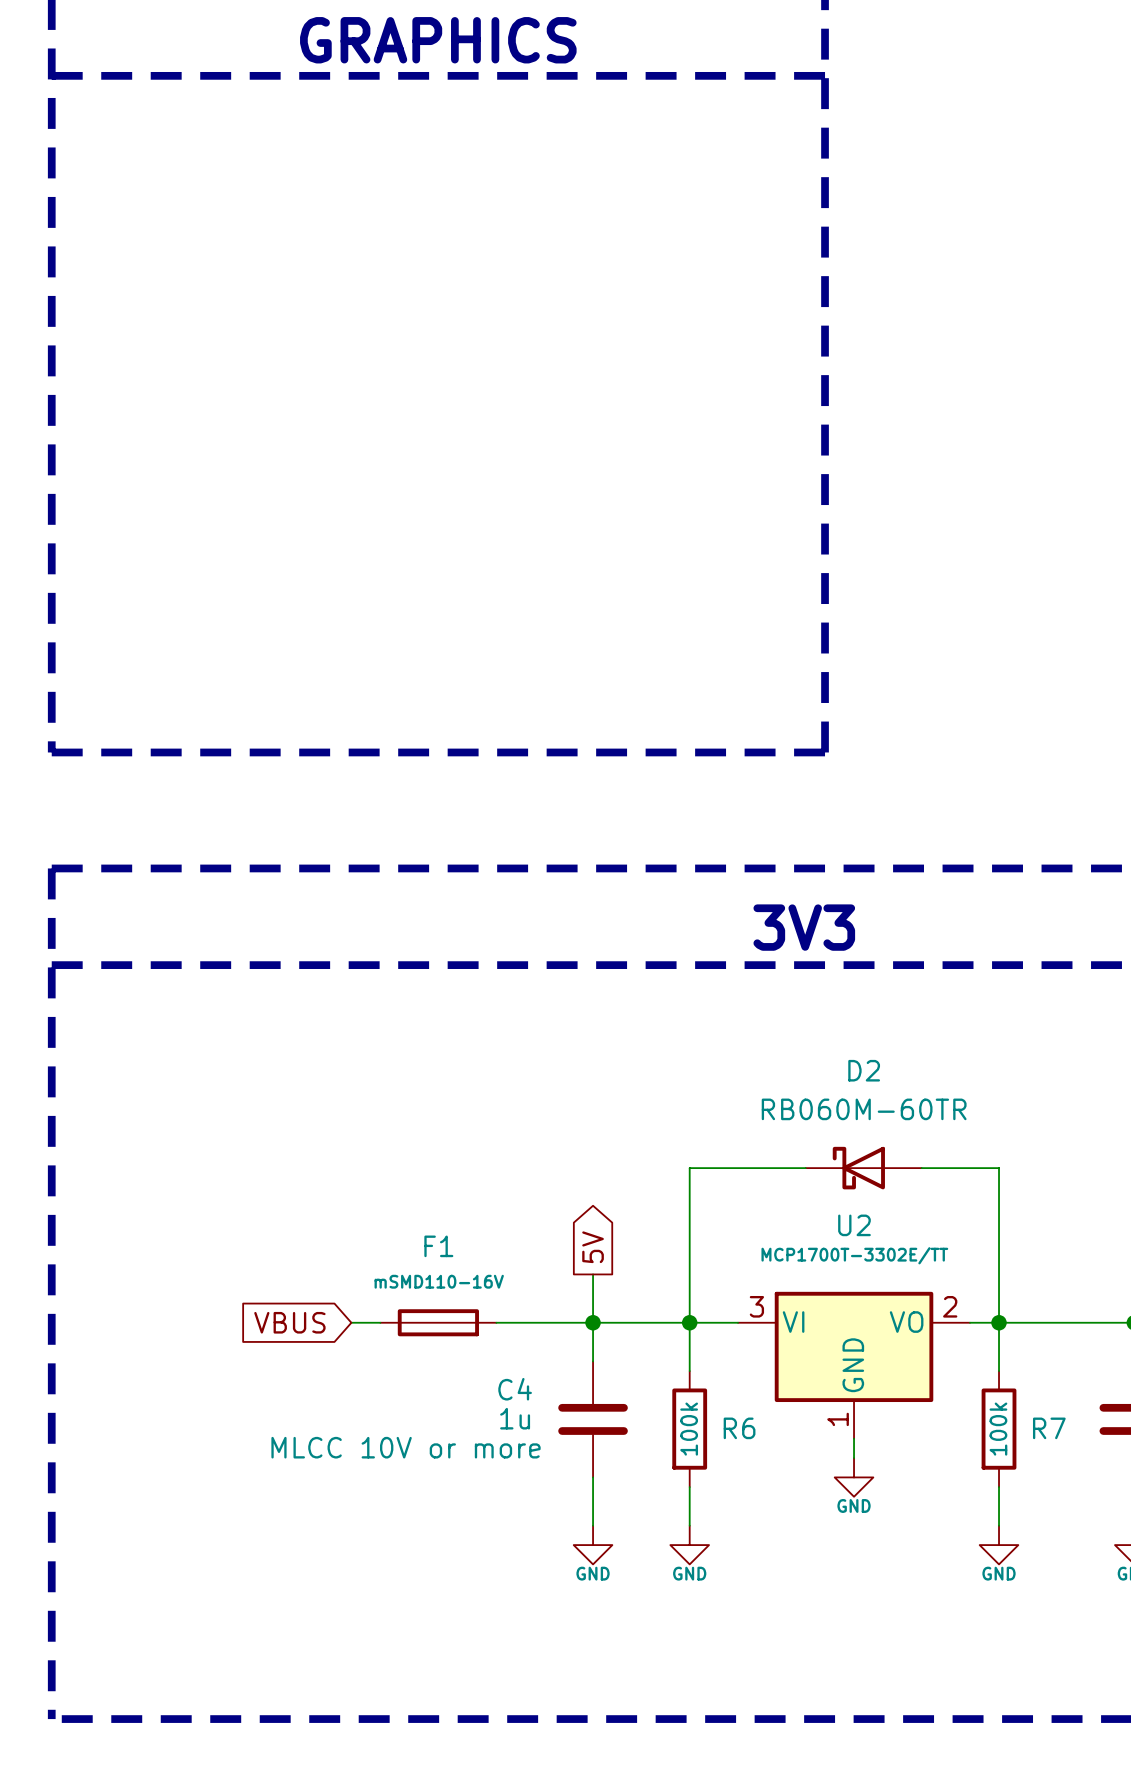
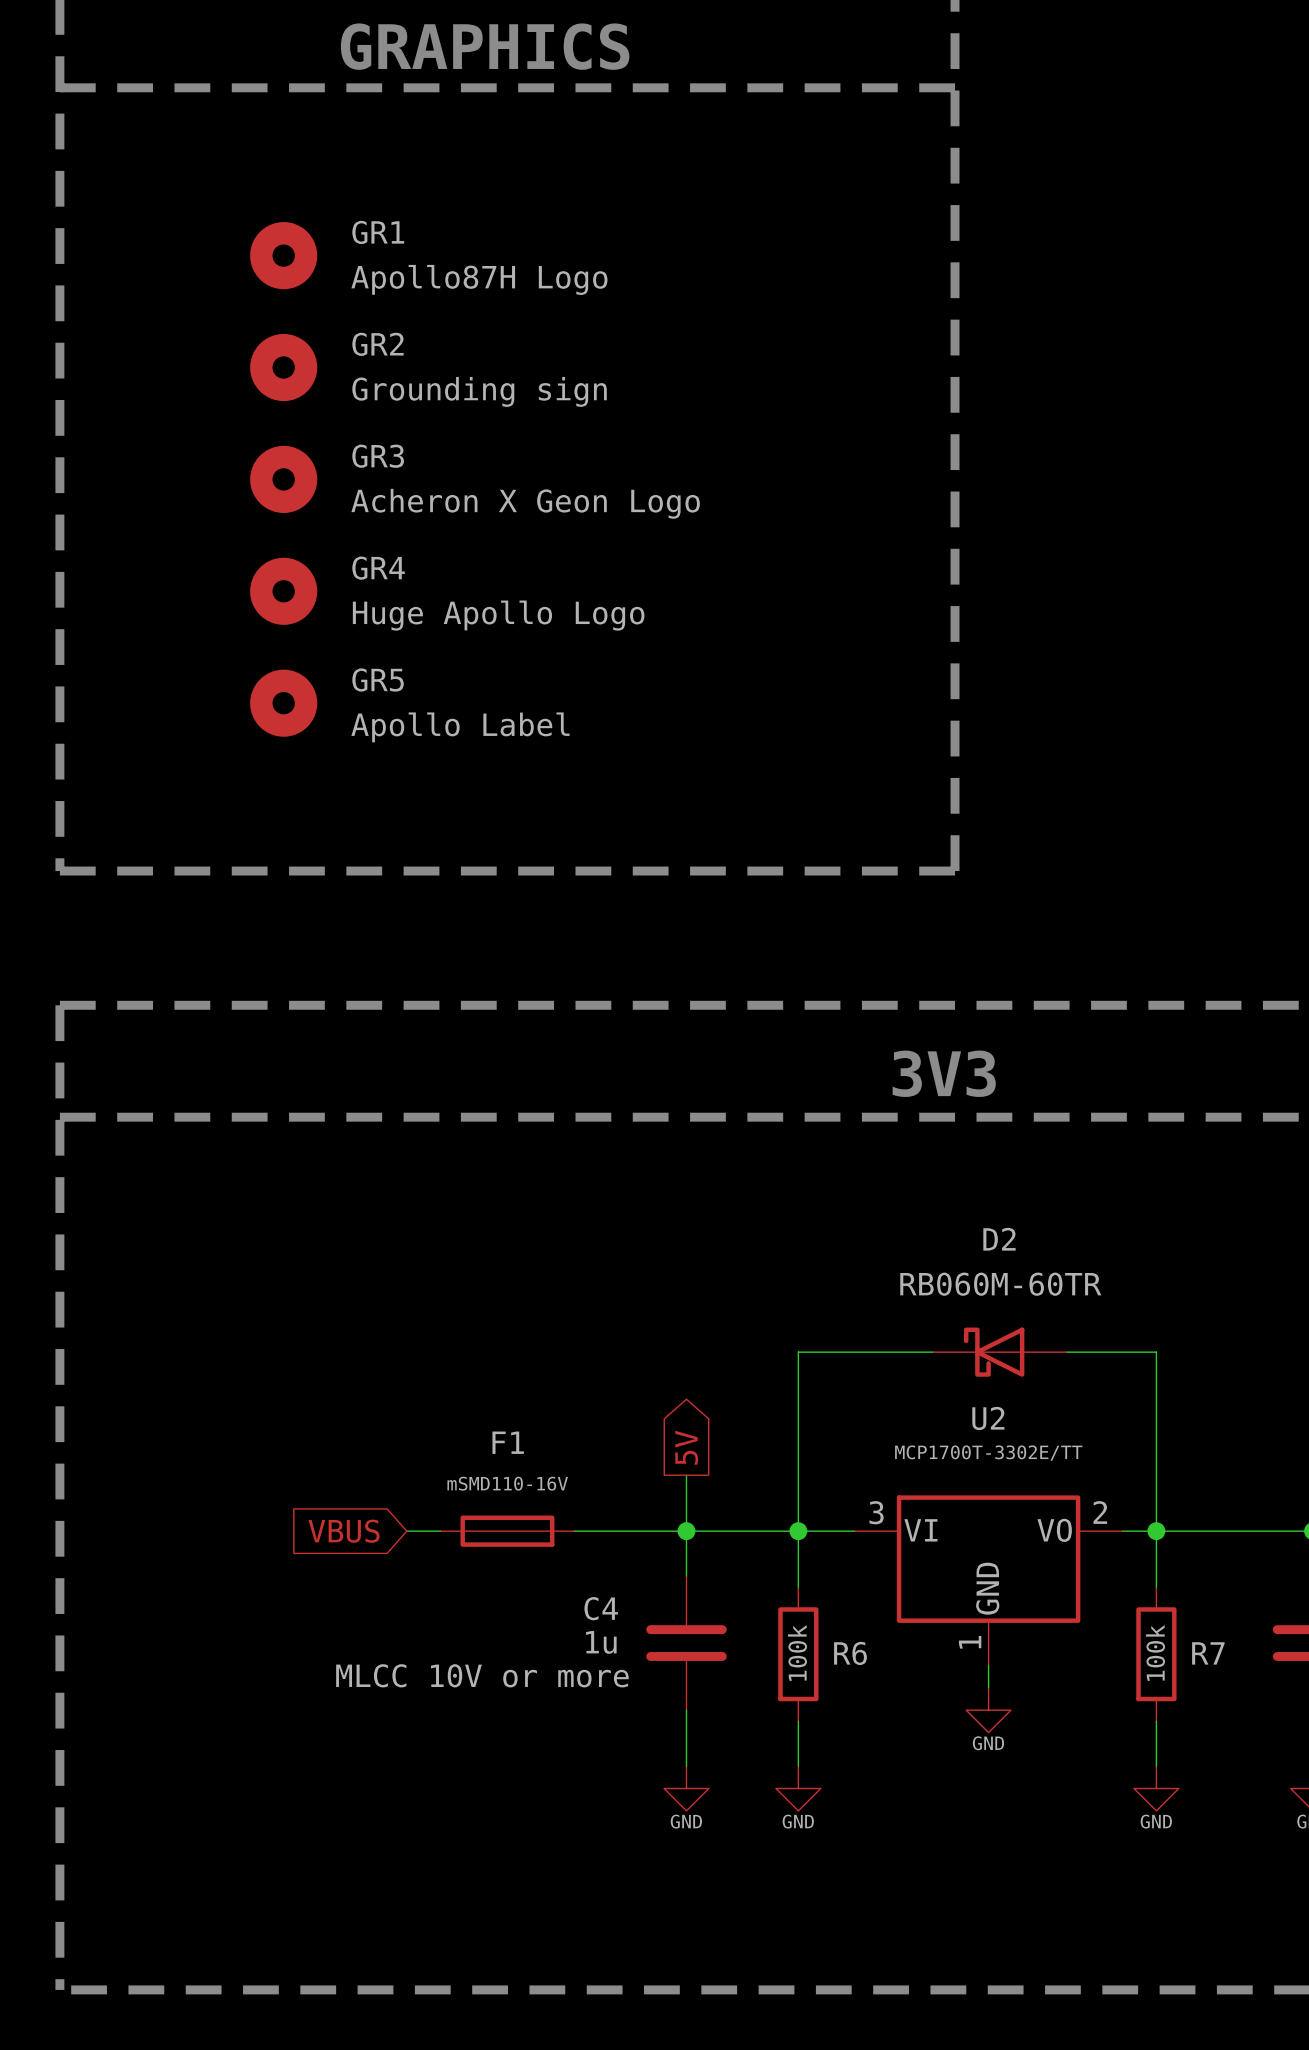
GR1: none -> Apollo87H Logo (283, 255)
GR2: none -> Grounding sign (283, 367)
GR3: none -> Acheron X Geon Logo (283, 479)
GR4: none -> Huge Apollo Logo (283, 591)
GR5: none -> Apollo Label (283, 703)

